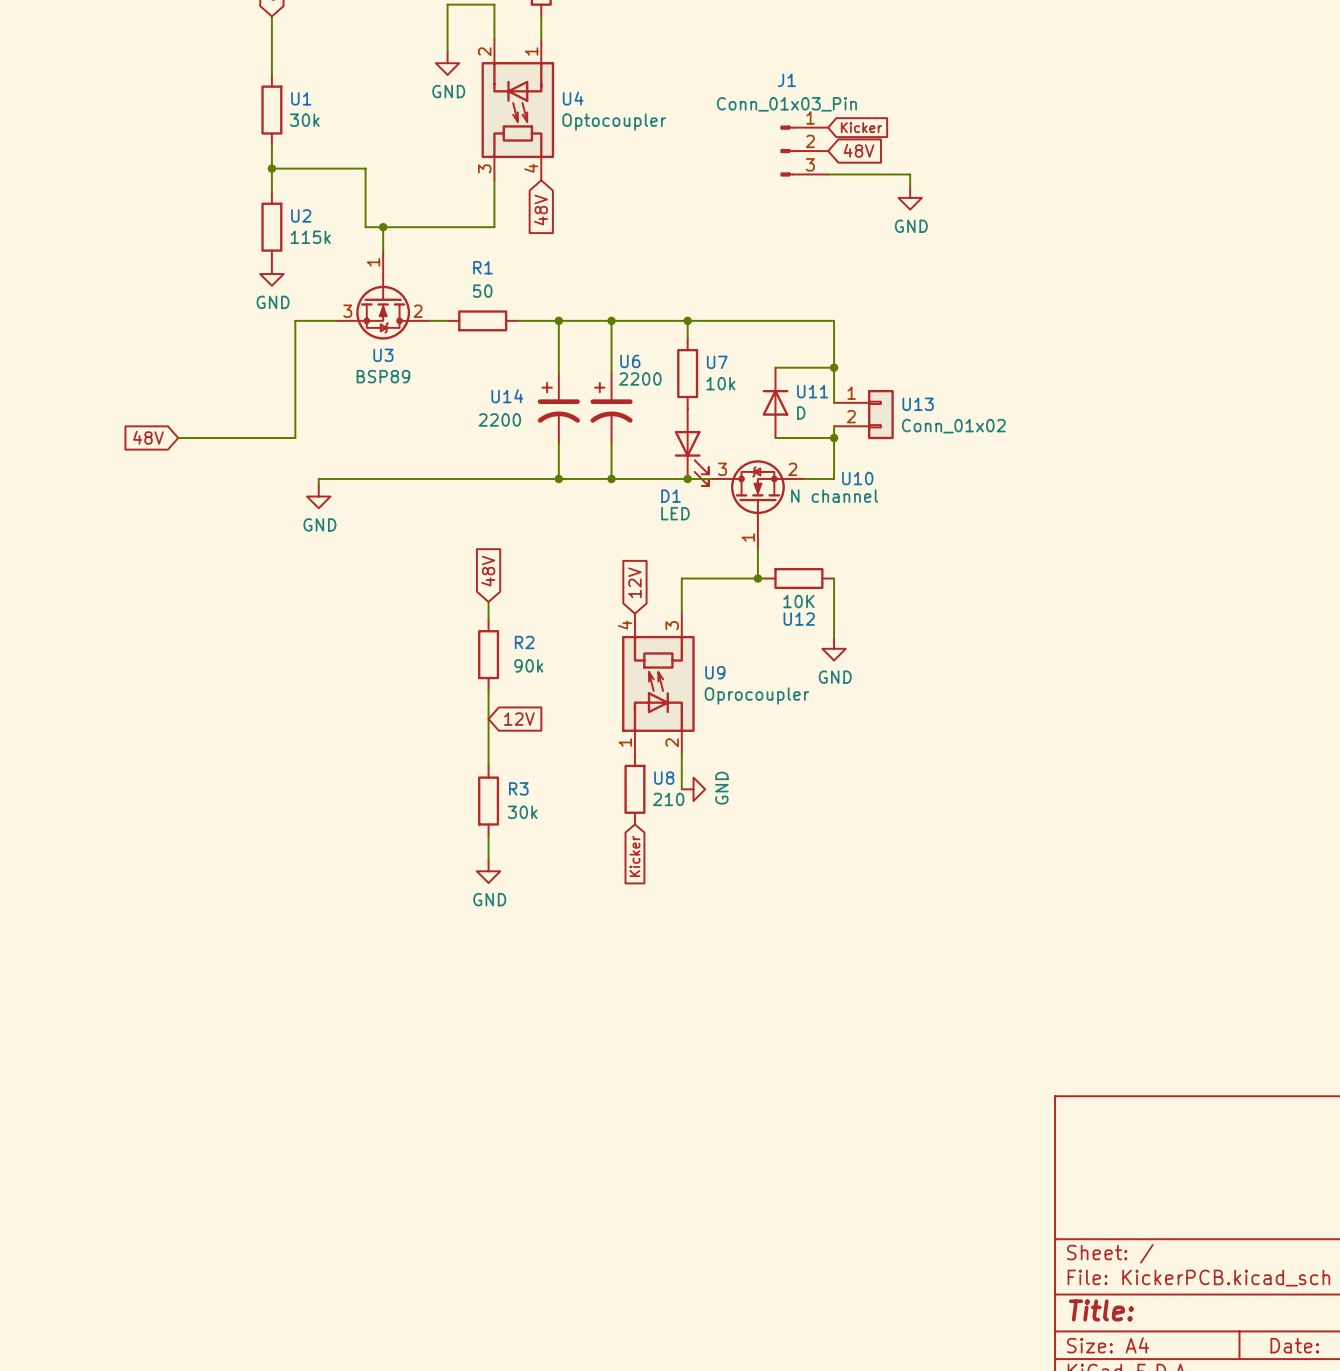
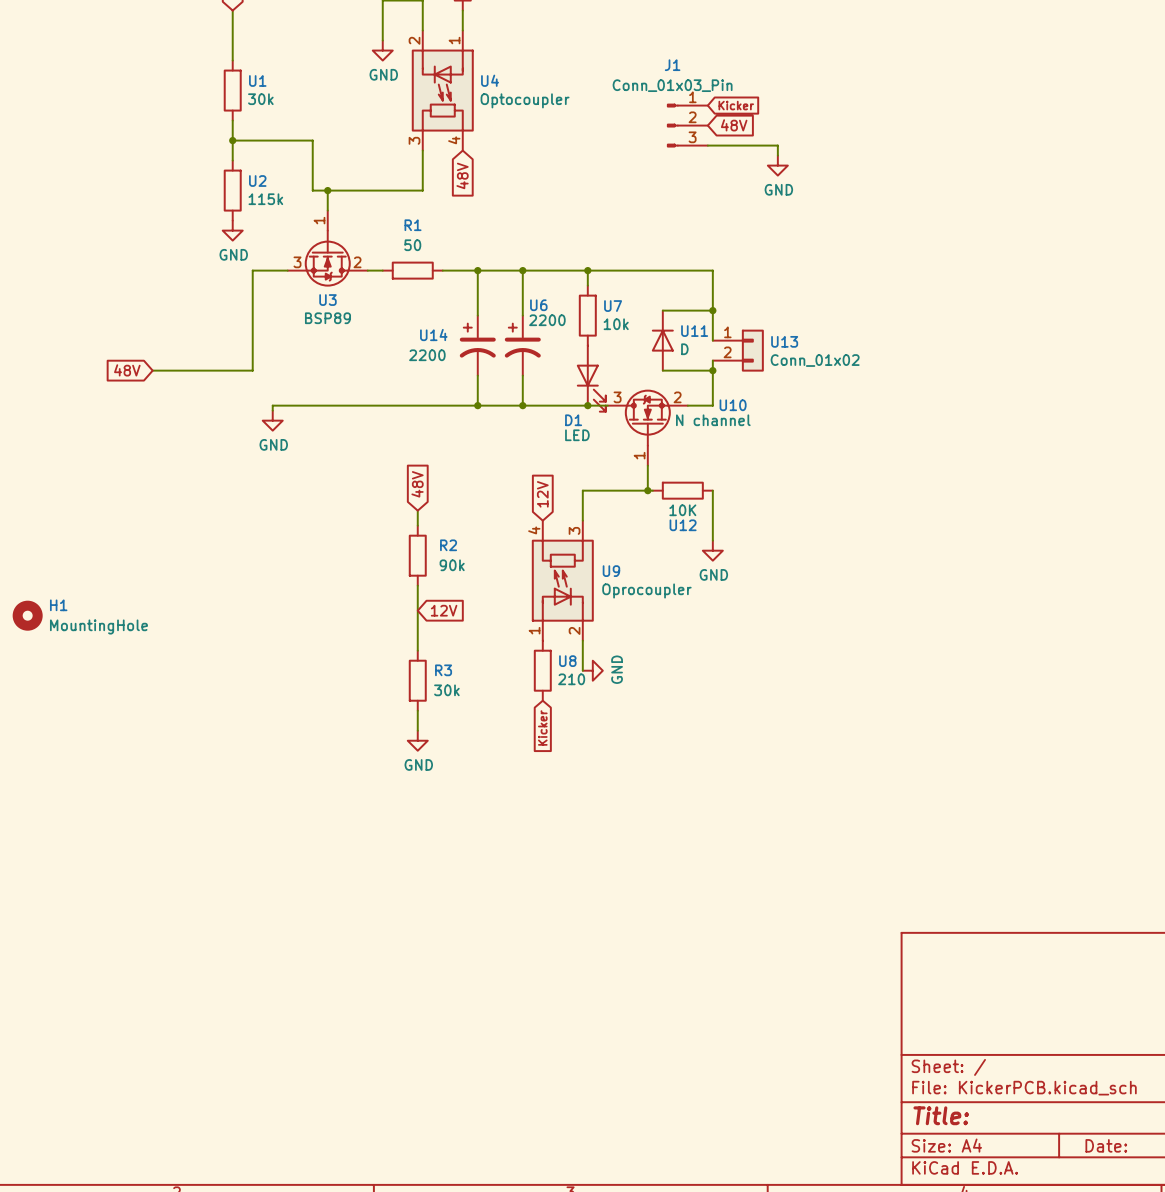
H1: none -> MountingHole (27, 615)

